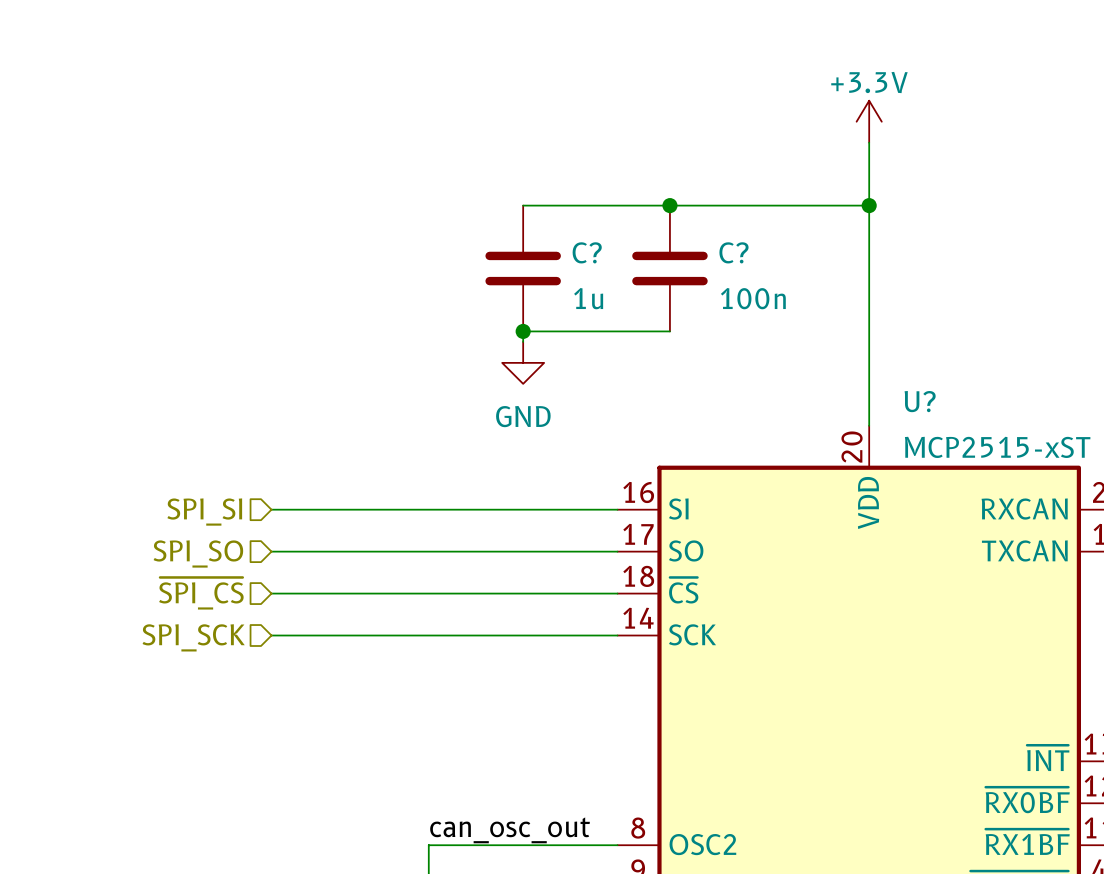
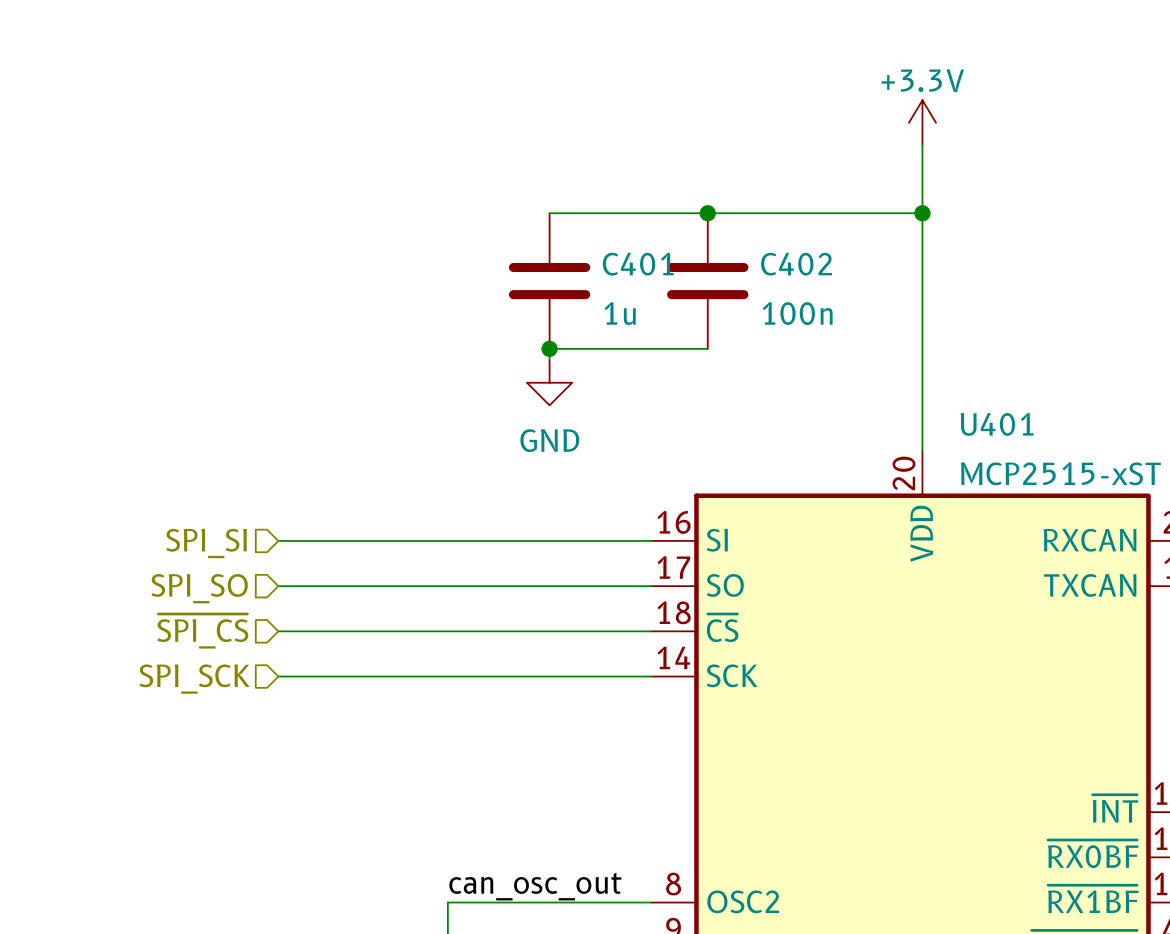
C? name: C? (587, 252) -> C401 (638, 264)
C? name: C? (733, 252) -> C402 (796, 264)
U? name: U? (920, 401) -> U401 (997, 424)

